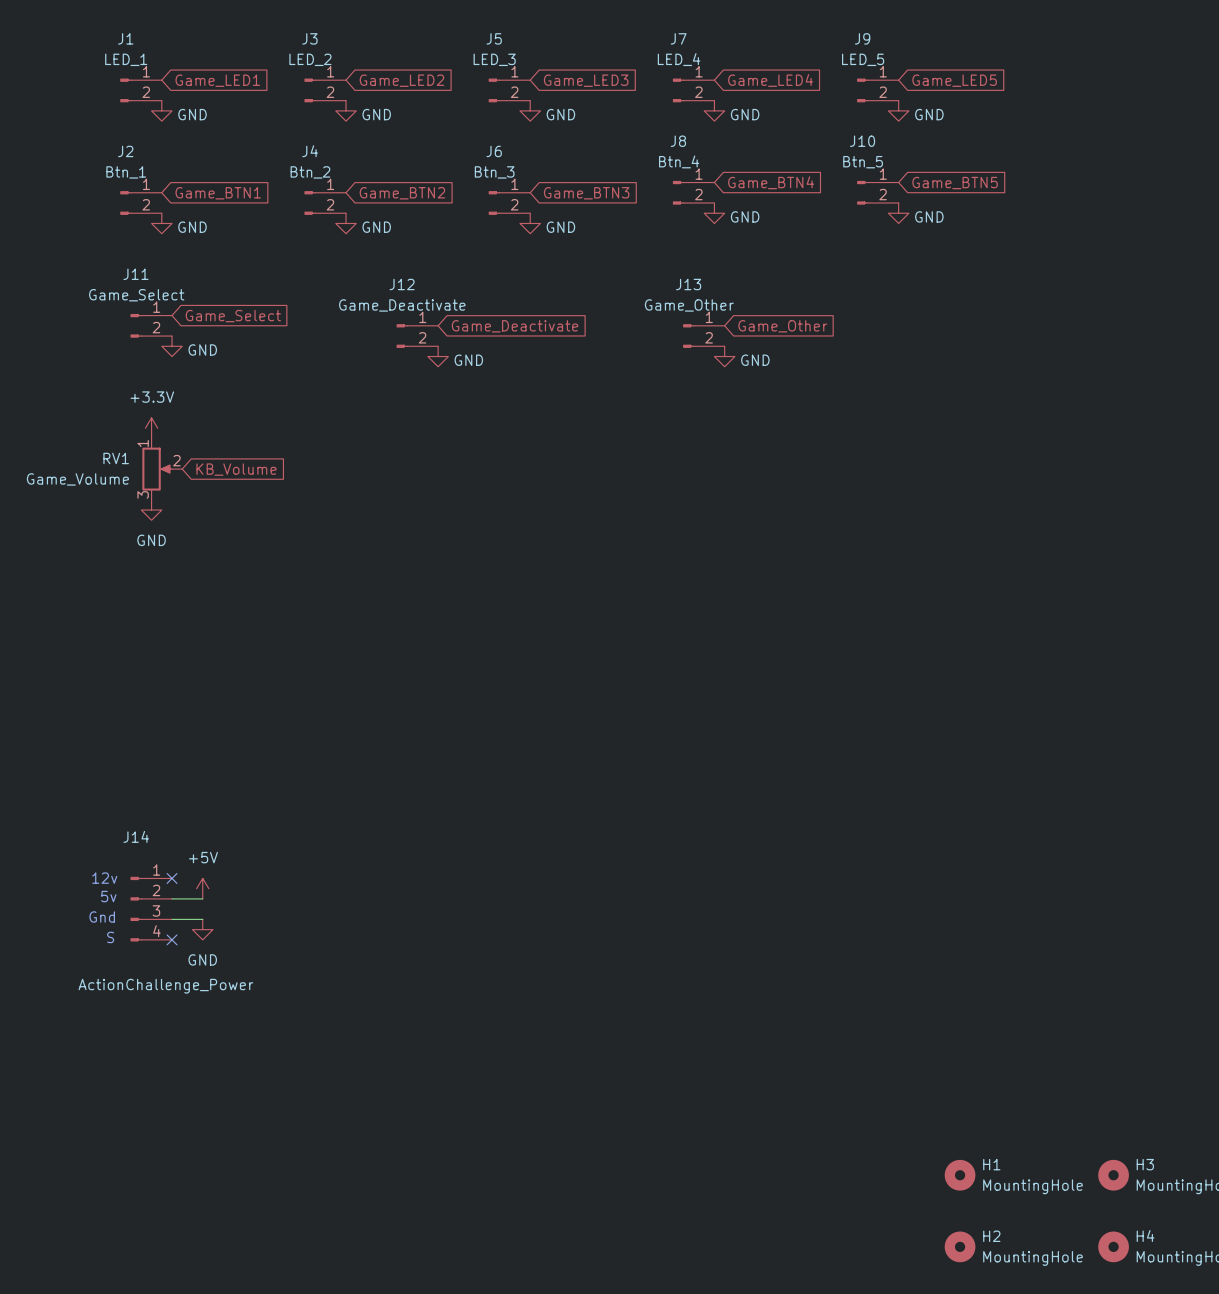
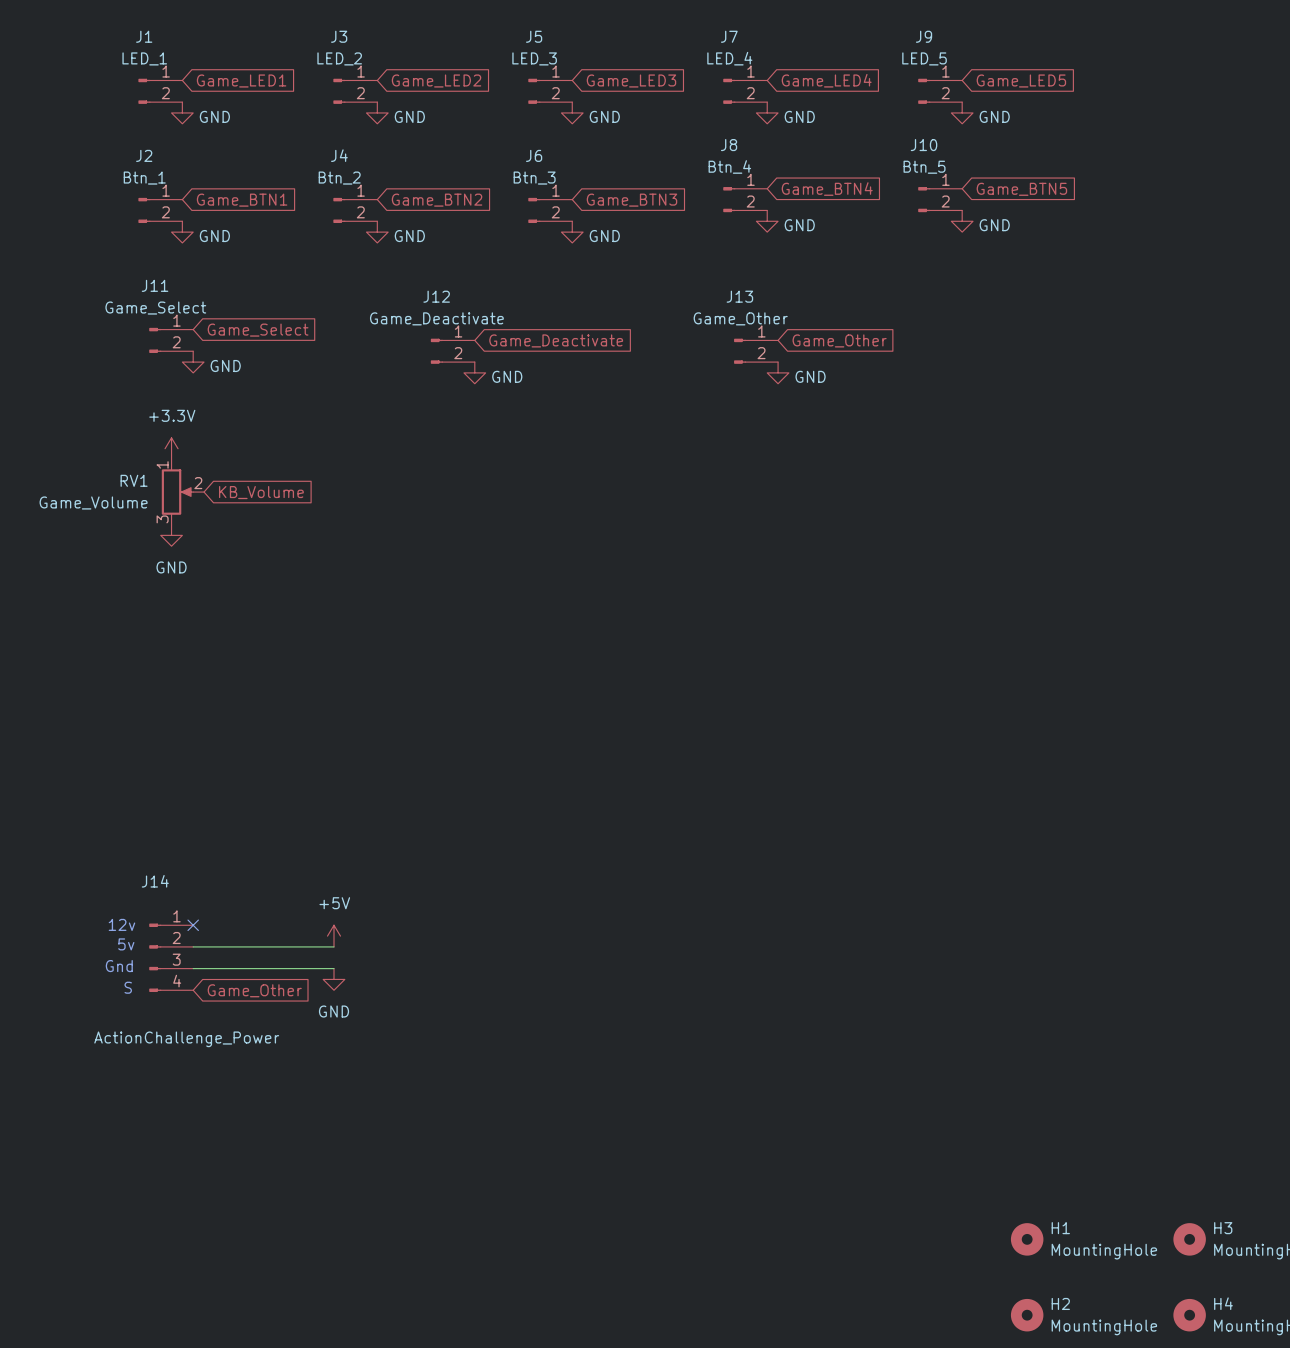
power symbol position: +5V (202, 888) -> +5V (334, 936)
wire: none -> (225, 946) (334, 946)
wire: none -> (225, 968) (334, 968)
power symbol position: GND (202, 929) -> GND (334, 979)
no-connect mark: (172, 939) -> none
global label: none -> Game_Other (254, 990)

